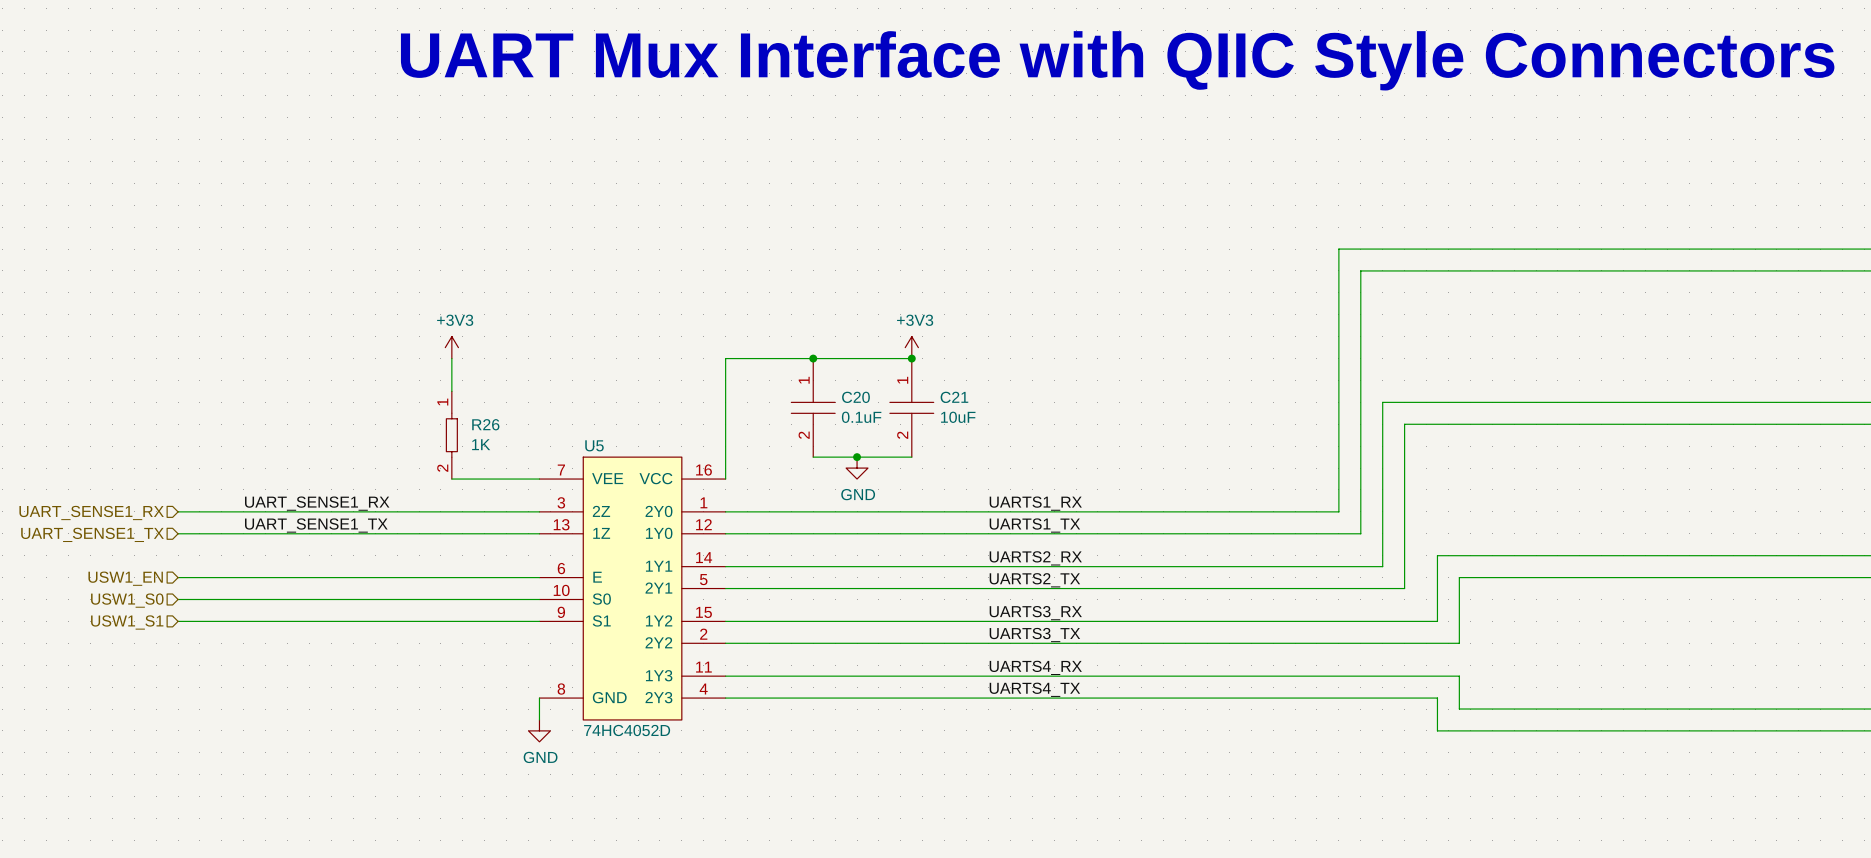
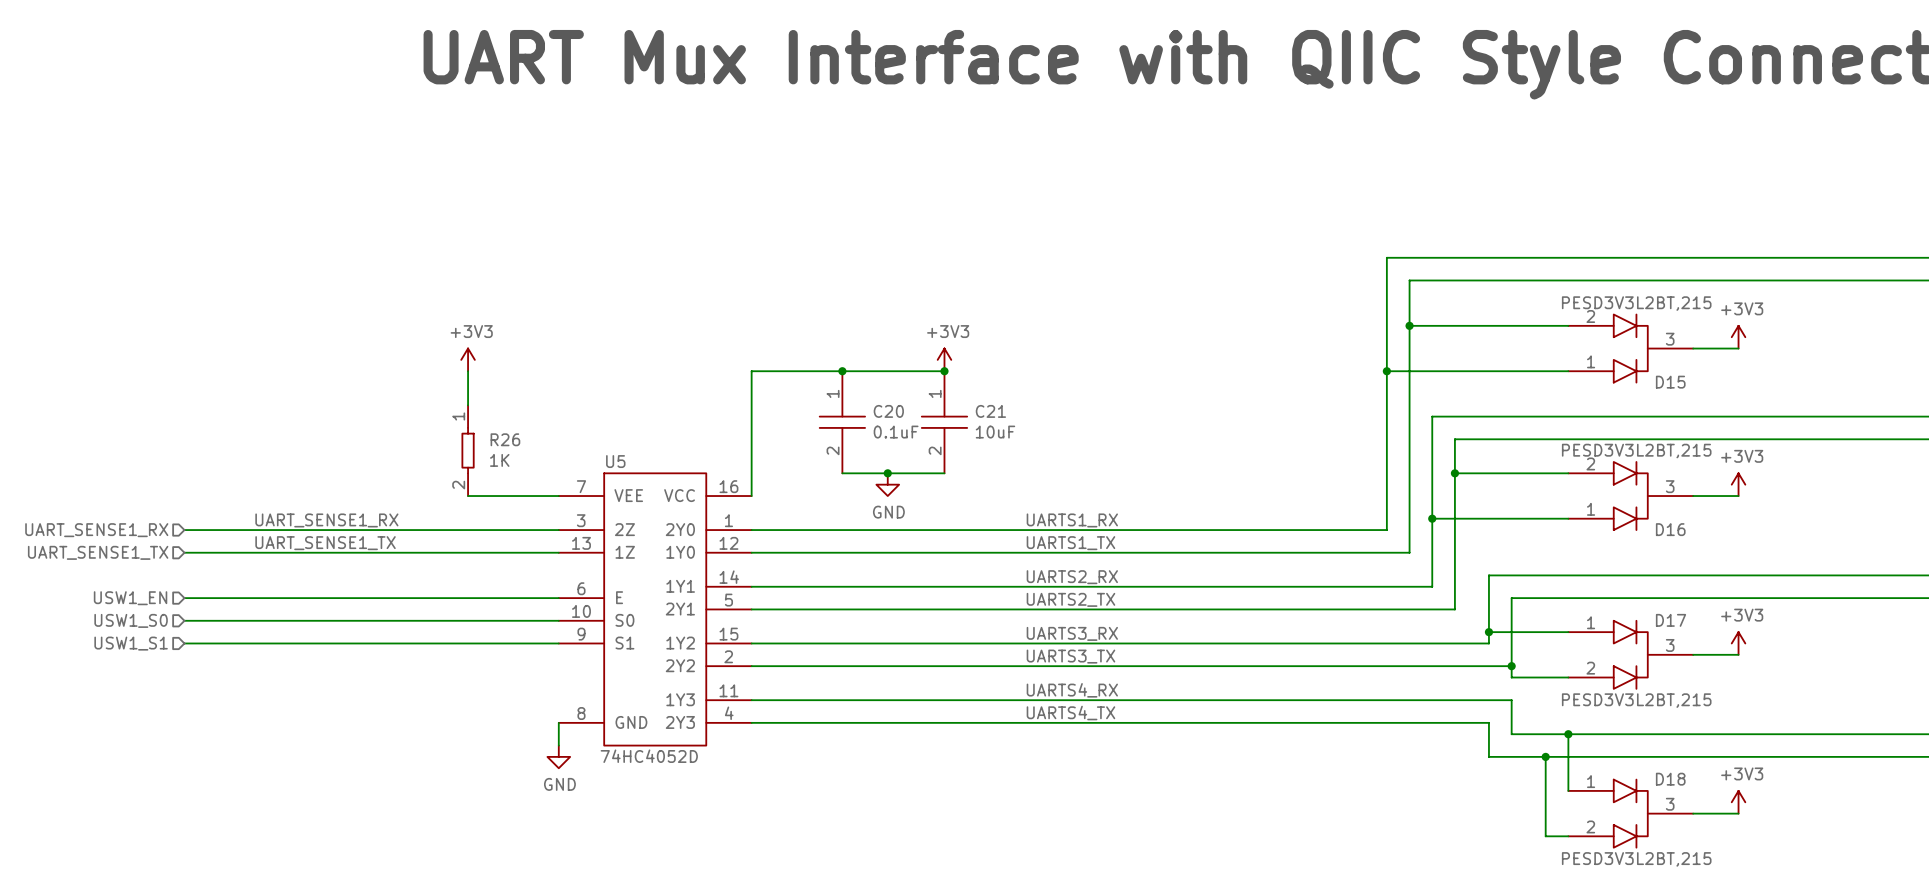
wire: none -> (1409, 325) (1568, 325)
junction: none -> (1409, 325)
power symbol: none -> +3V3 (1738, 337)
D15: none -> (1630, 348)
wire: none -> (1693, 348) (1738, 348)
wire: none -> (1386, 371) (1568, 371)
junction: none -> (1386, 371)
wire: none -> (1454, 473) (1568, 473)
junction: none -> (1454, 473)
power symbol: none -> +3V3 (1738, 484)
D16: none -> (1630, 496)
wire: none -> (1693, 496) (1738, 496)
wire: none -> (1432, 518) (1568, 518)
junction: none -> (1432, 518)
wire: none -> (1488, 632) (1568, 632)
junction: none -> (1488, 632)
power symbol: none -> +3V3 (1738, 643)
D17: none -> (1630, 654)
wire: none -> (1693, 654) (1738, 654)
wire: none -> (1511, 666) (1511, 677) (1568, 677)
junction: none -> (1511, 666)
wire: none -> (1568, 734) (1568, 790)
junction: none -> (1568, 734)
wire: none -> (1545, 756) (1545, 836) (1568, 836)
junction: none -> (1545, 756)
power symbol: none -> +3V3 (1738, 802)
D18: none -> (1630, 813)
wire: none -> (1693, 813) (1738, 813)

